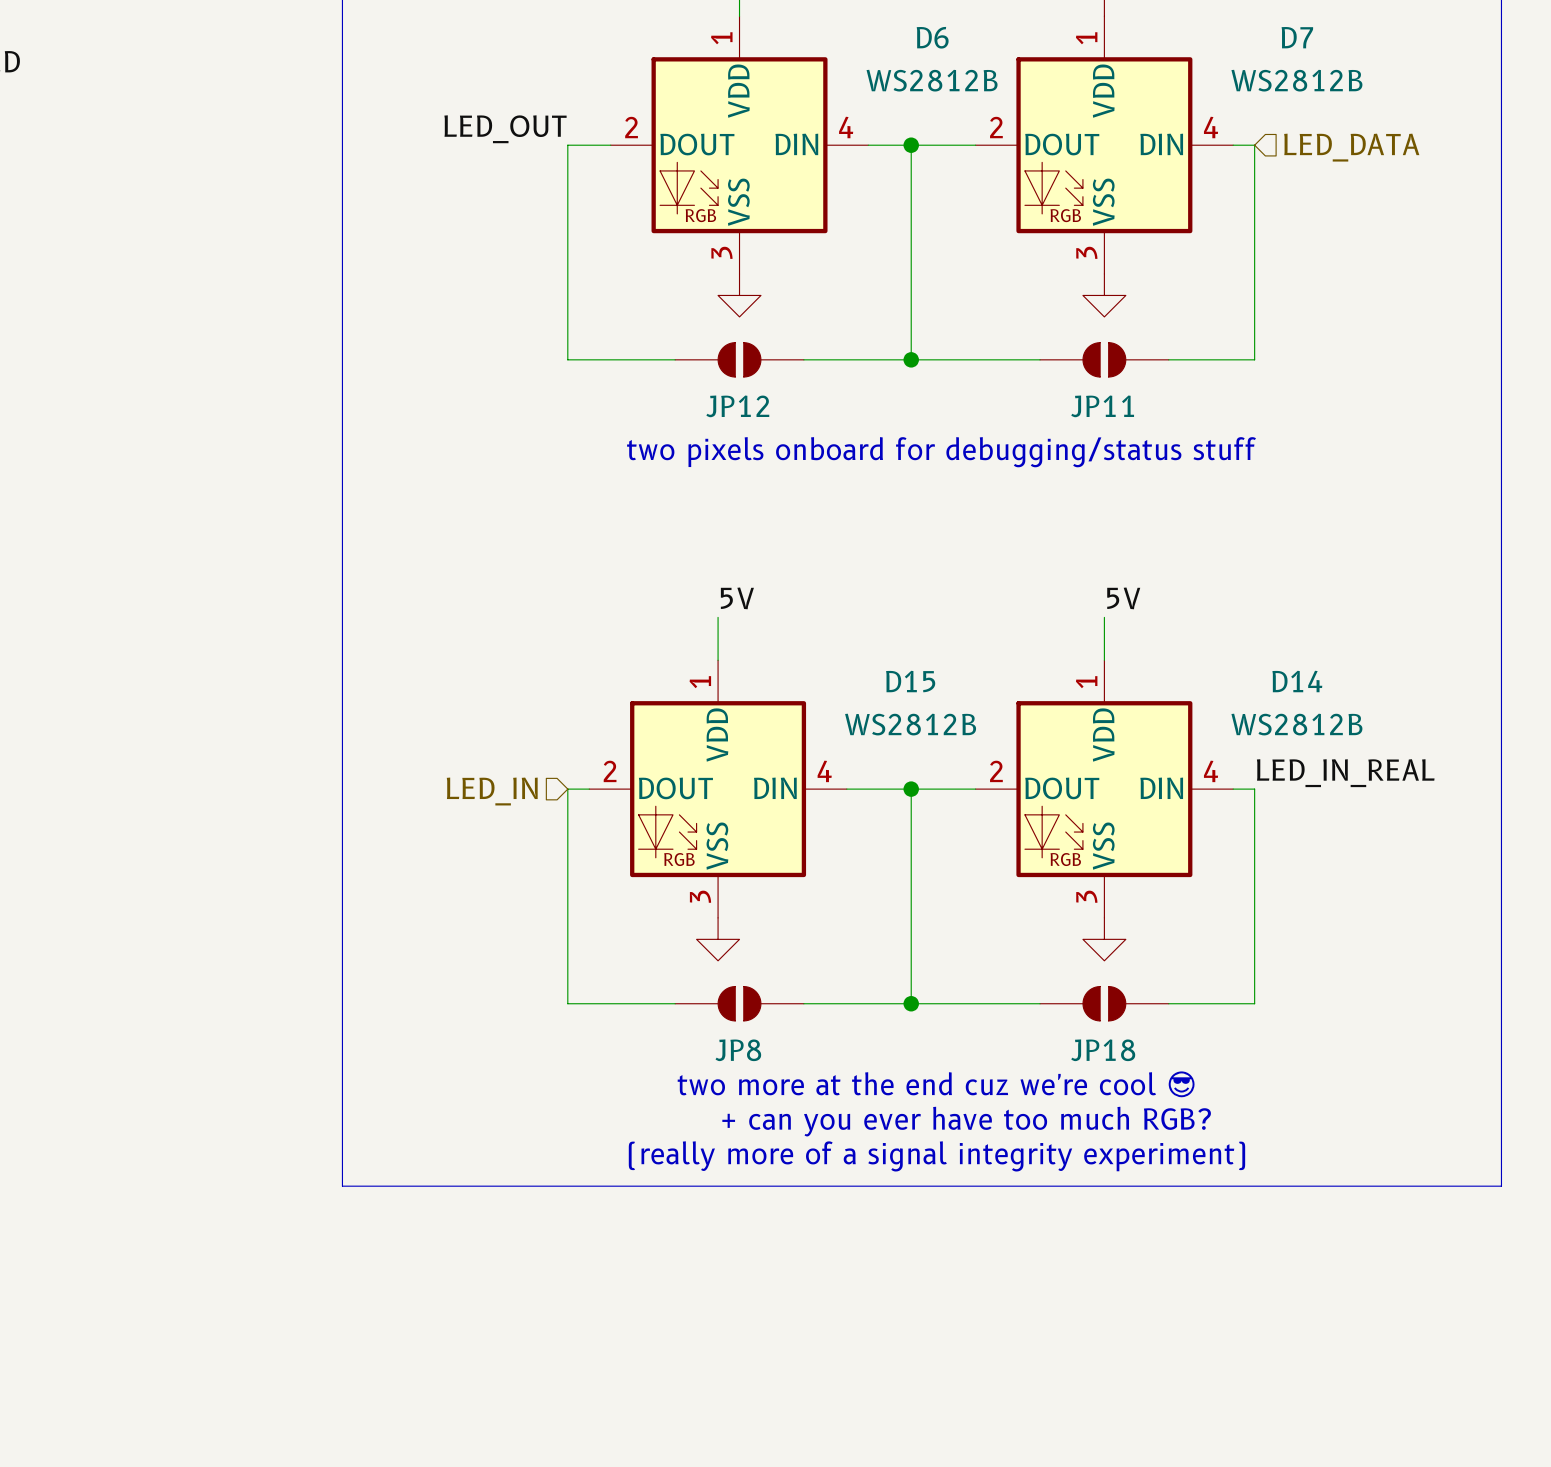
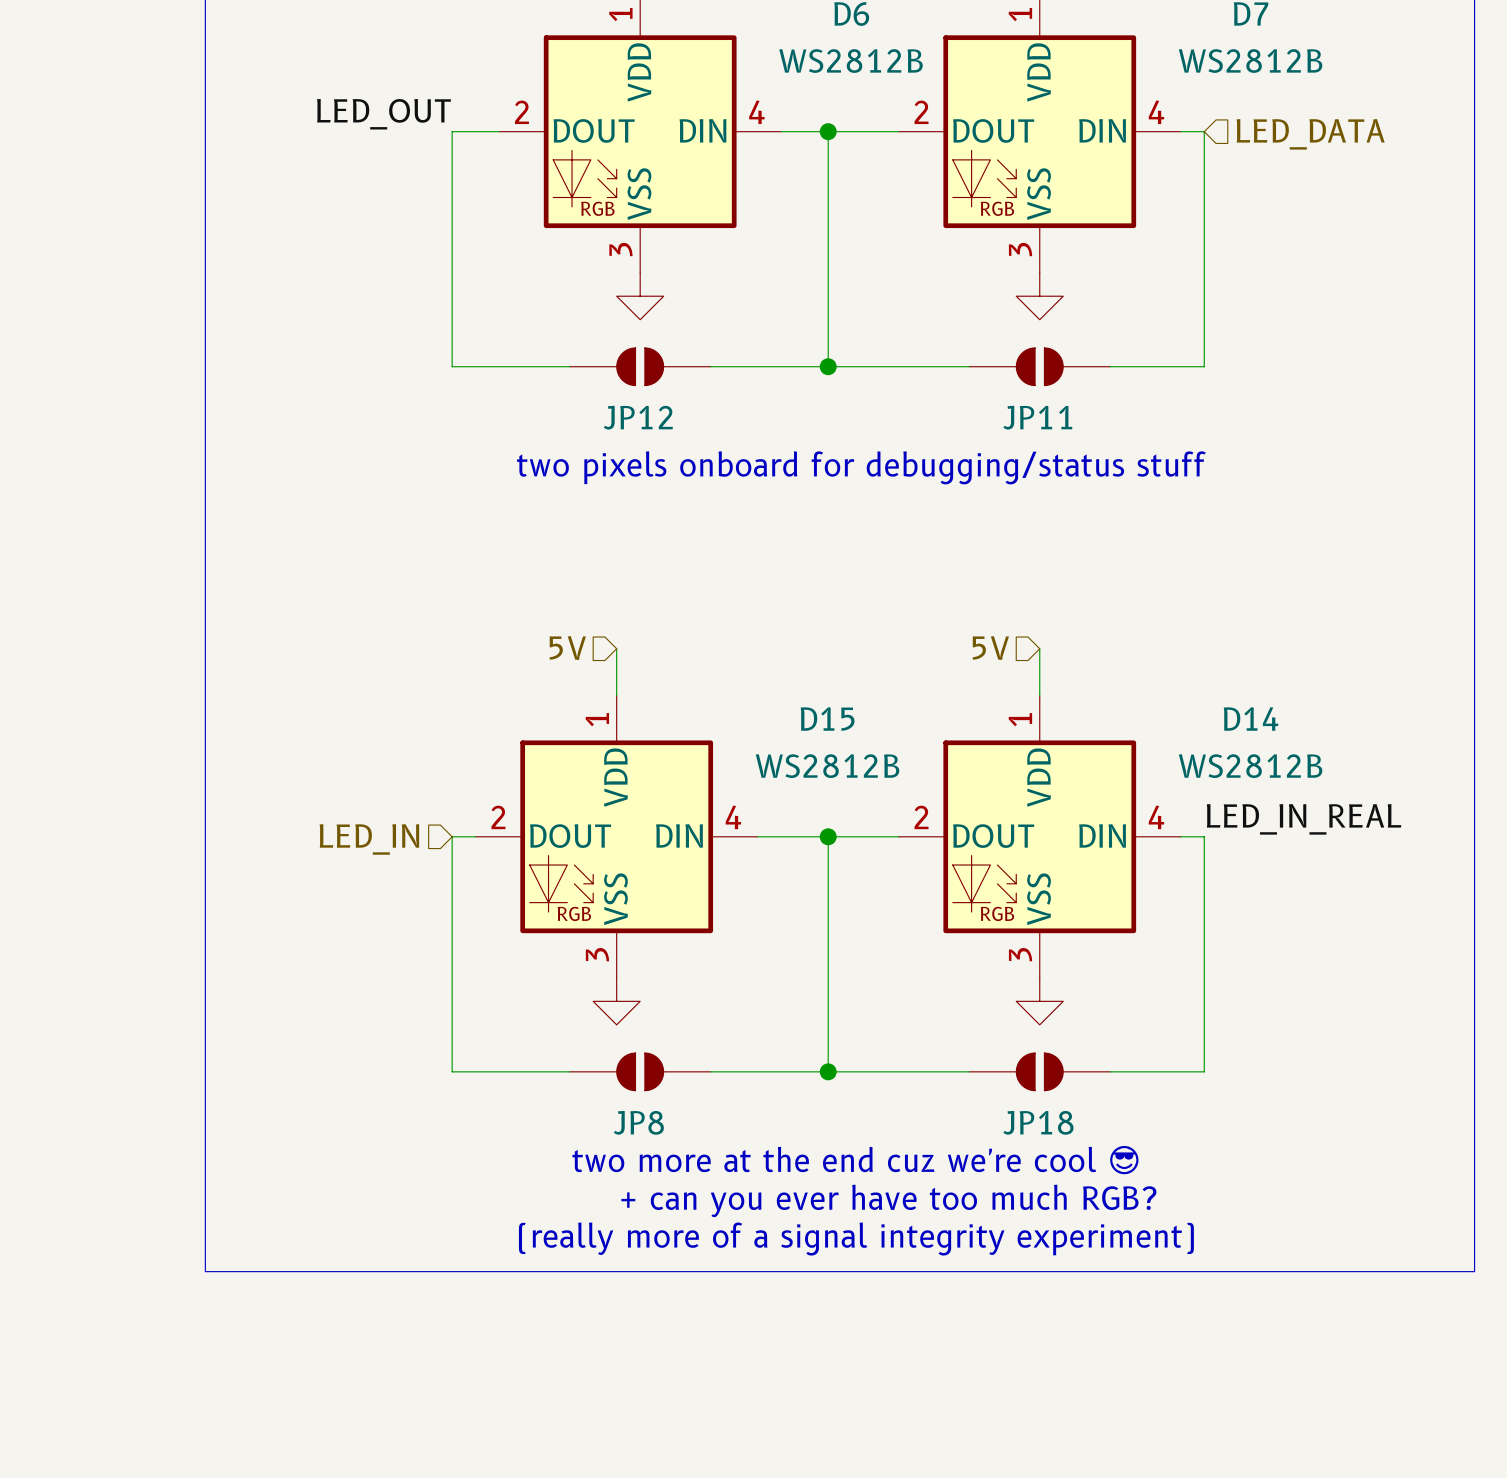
label: 5V (737, 598) -> none
label: 5V (1123, 598) -> none
hierarchical label: none -> 5V (567, 648)
hierarchical label: none -> 5V (990, 648)

